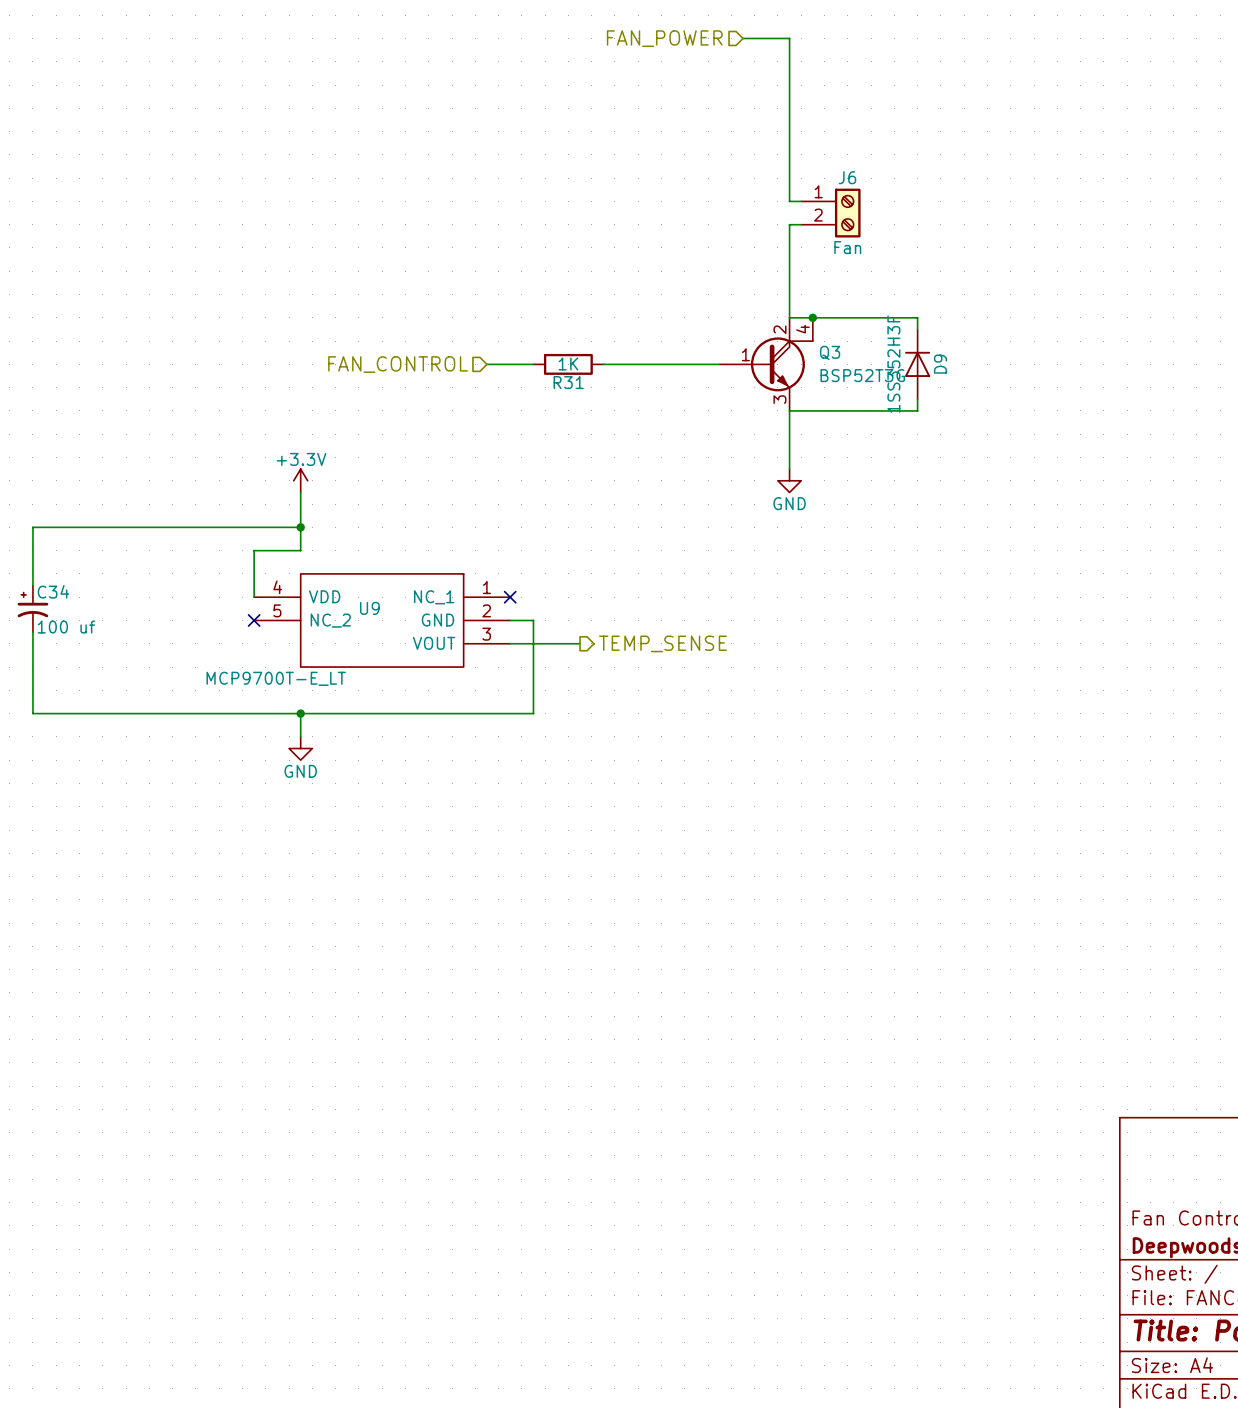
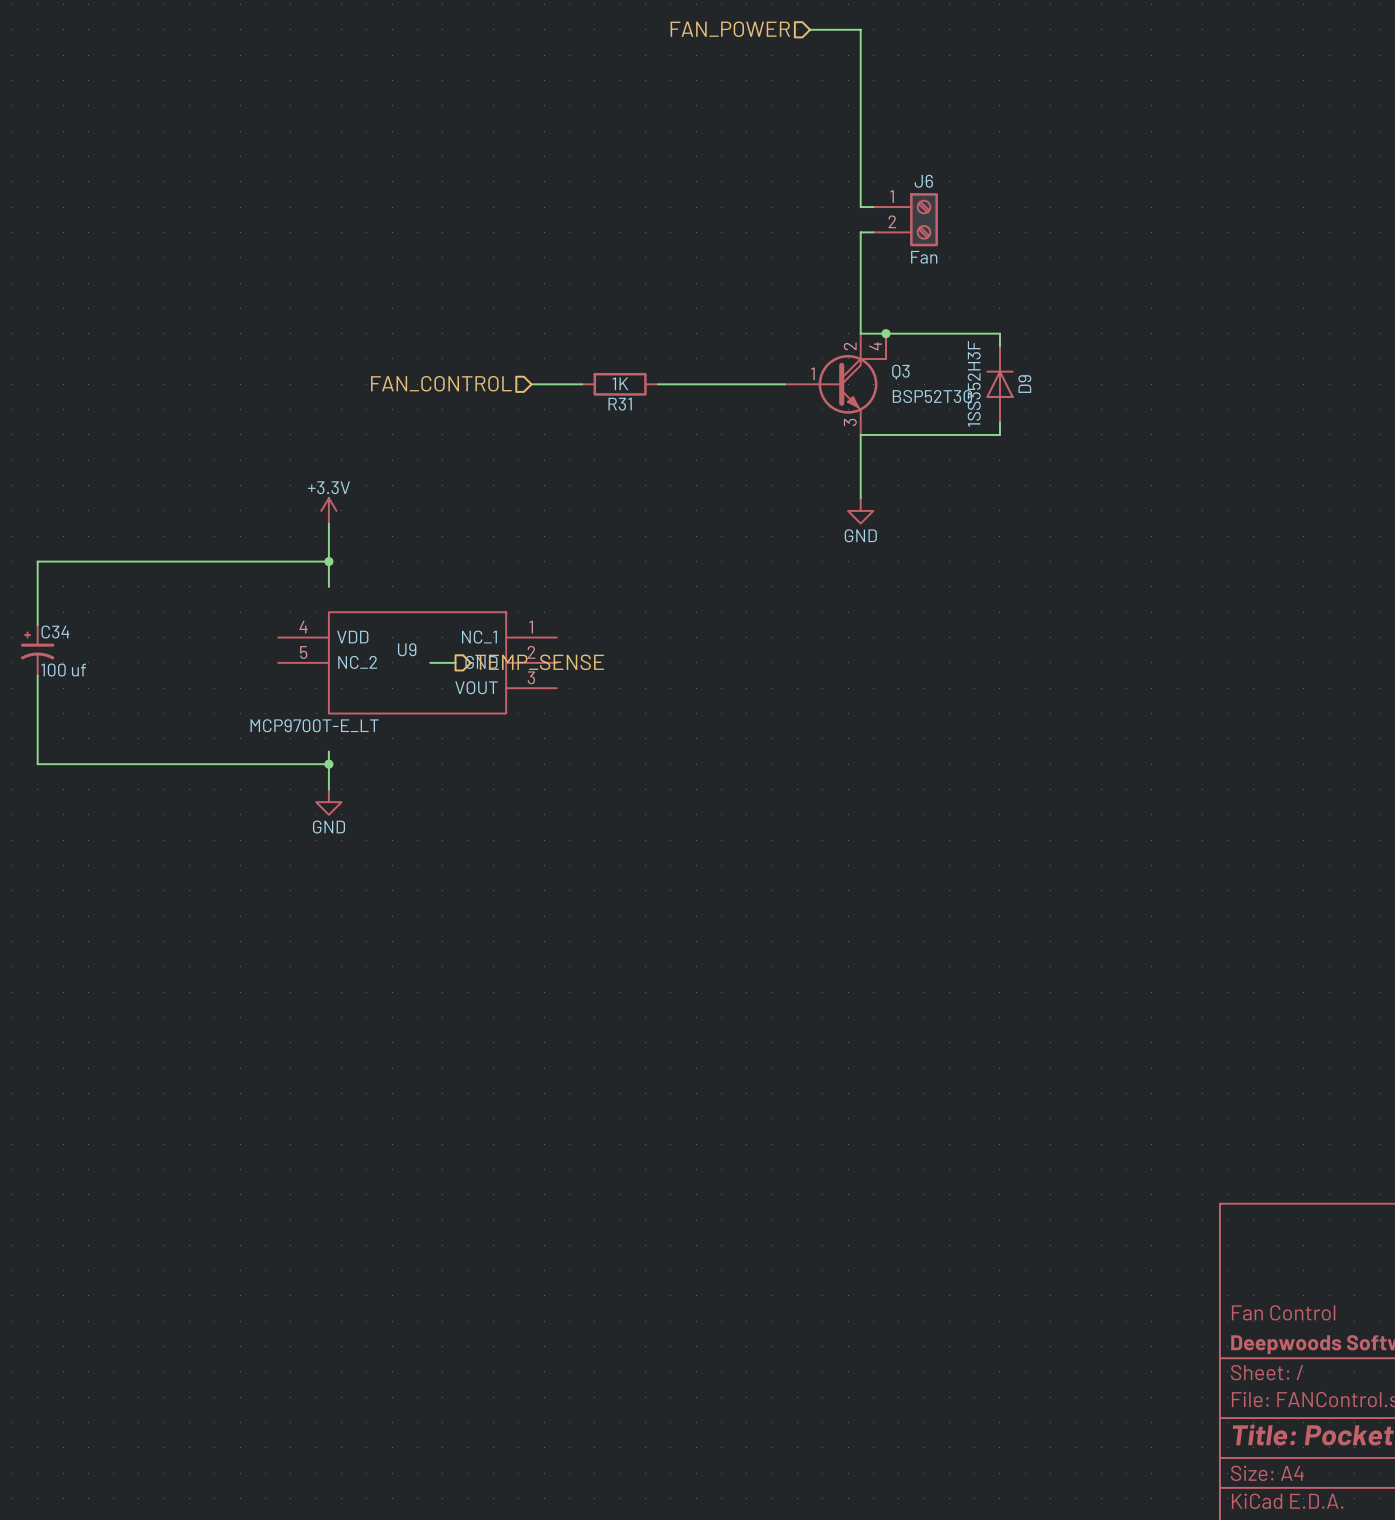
wire: (300, 550) (254, 550) (254, 597) -> none
no-connect mark: (510, 597) -> none
no-connect mark: (254, 620) -> none
wire: none -> (430, 662) (455, 662)
wire: (510, 620) (533, 620) (533, 713) (300, 713) -> (328, 751) (328, 764)
wire: (510, 643) (580, 643) -> none
hierarchical label position: TEMP_SENSE (662, 643) -> TEMP_SENSE (539, 662)

